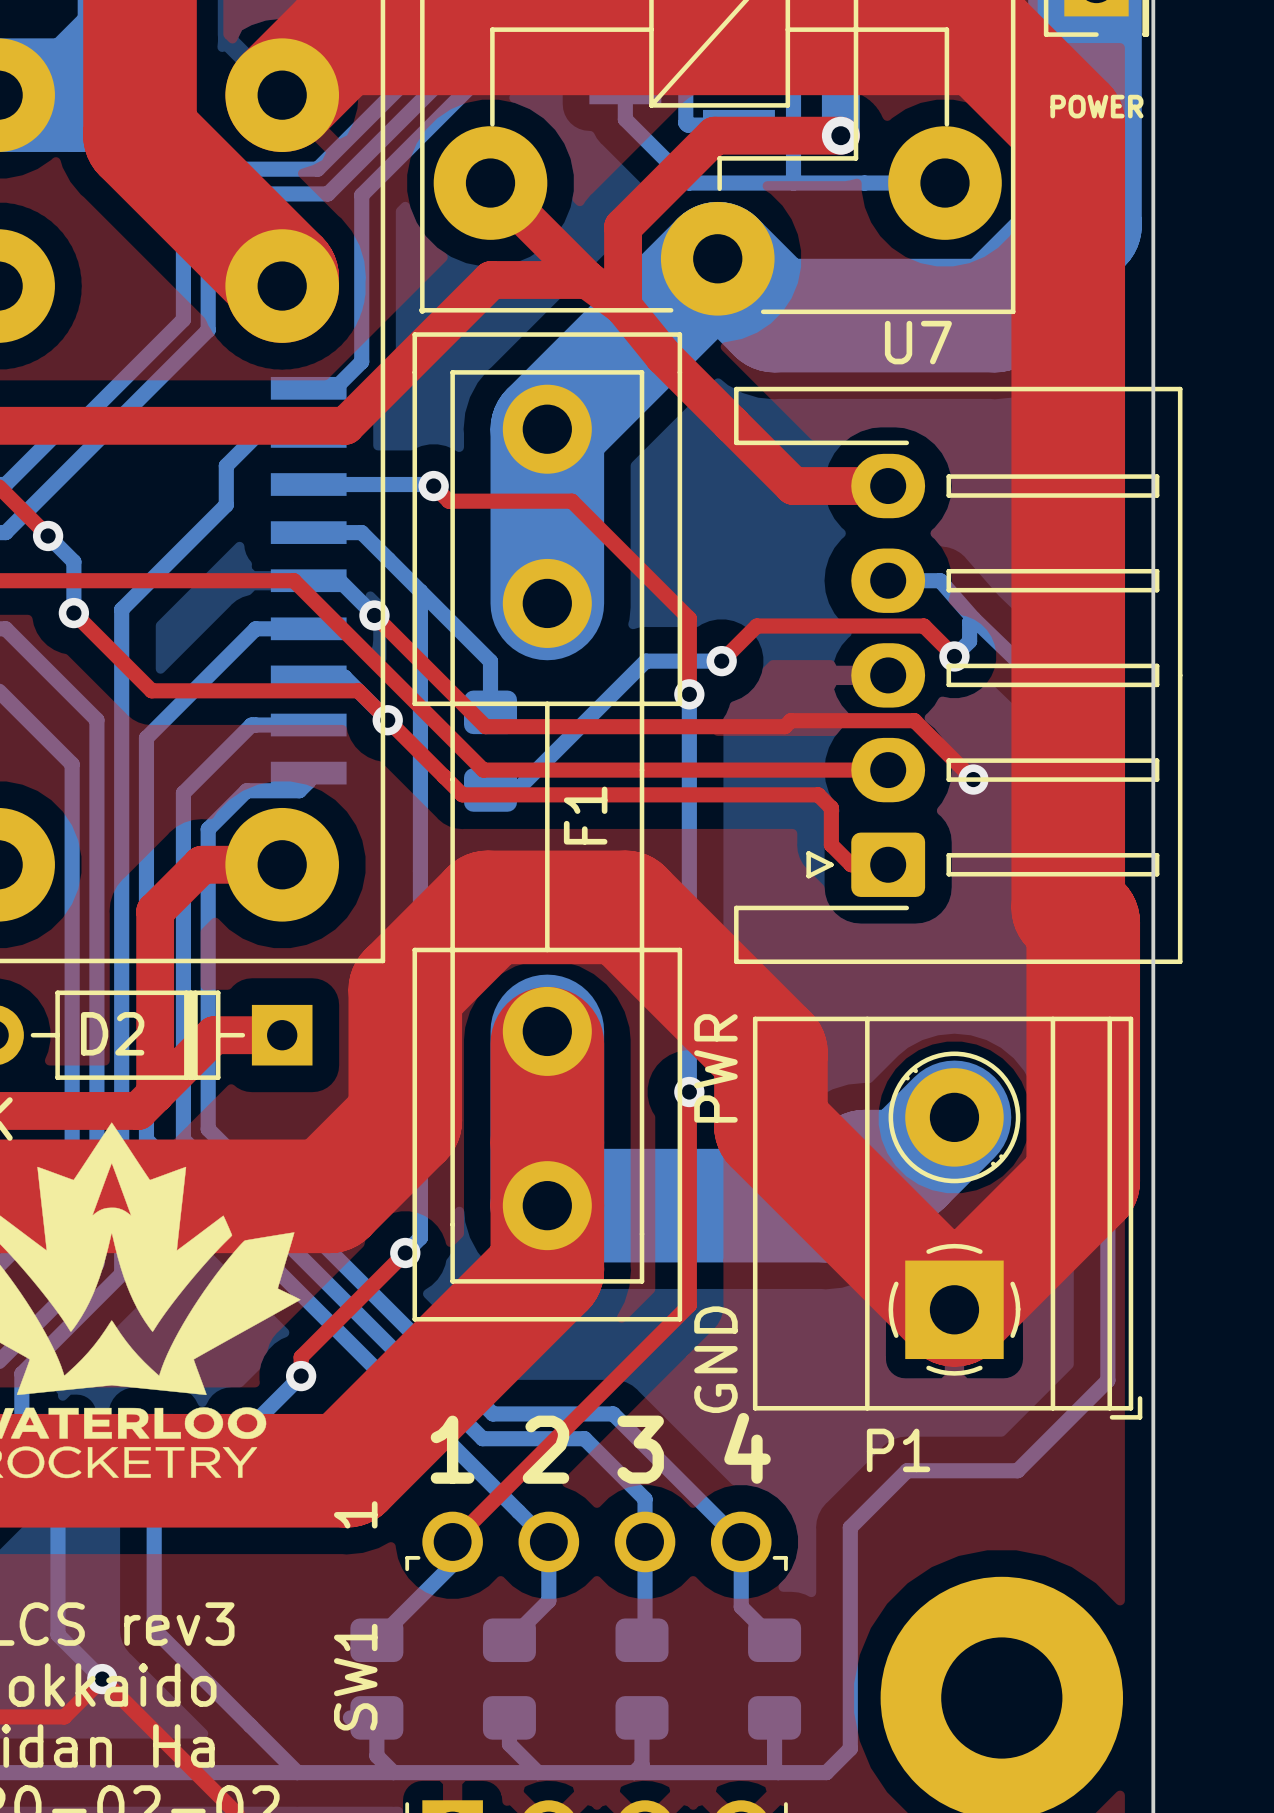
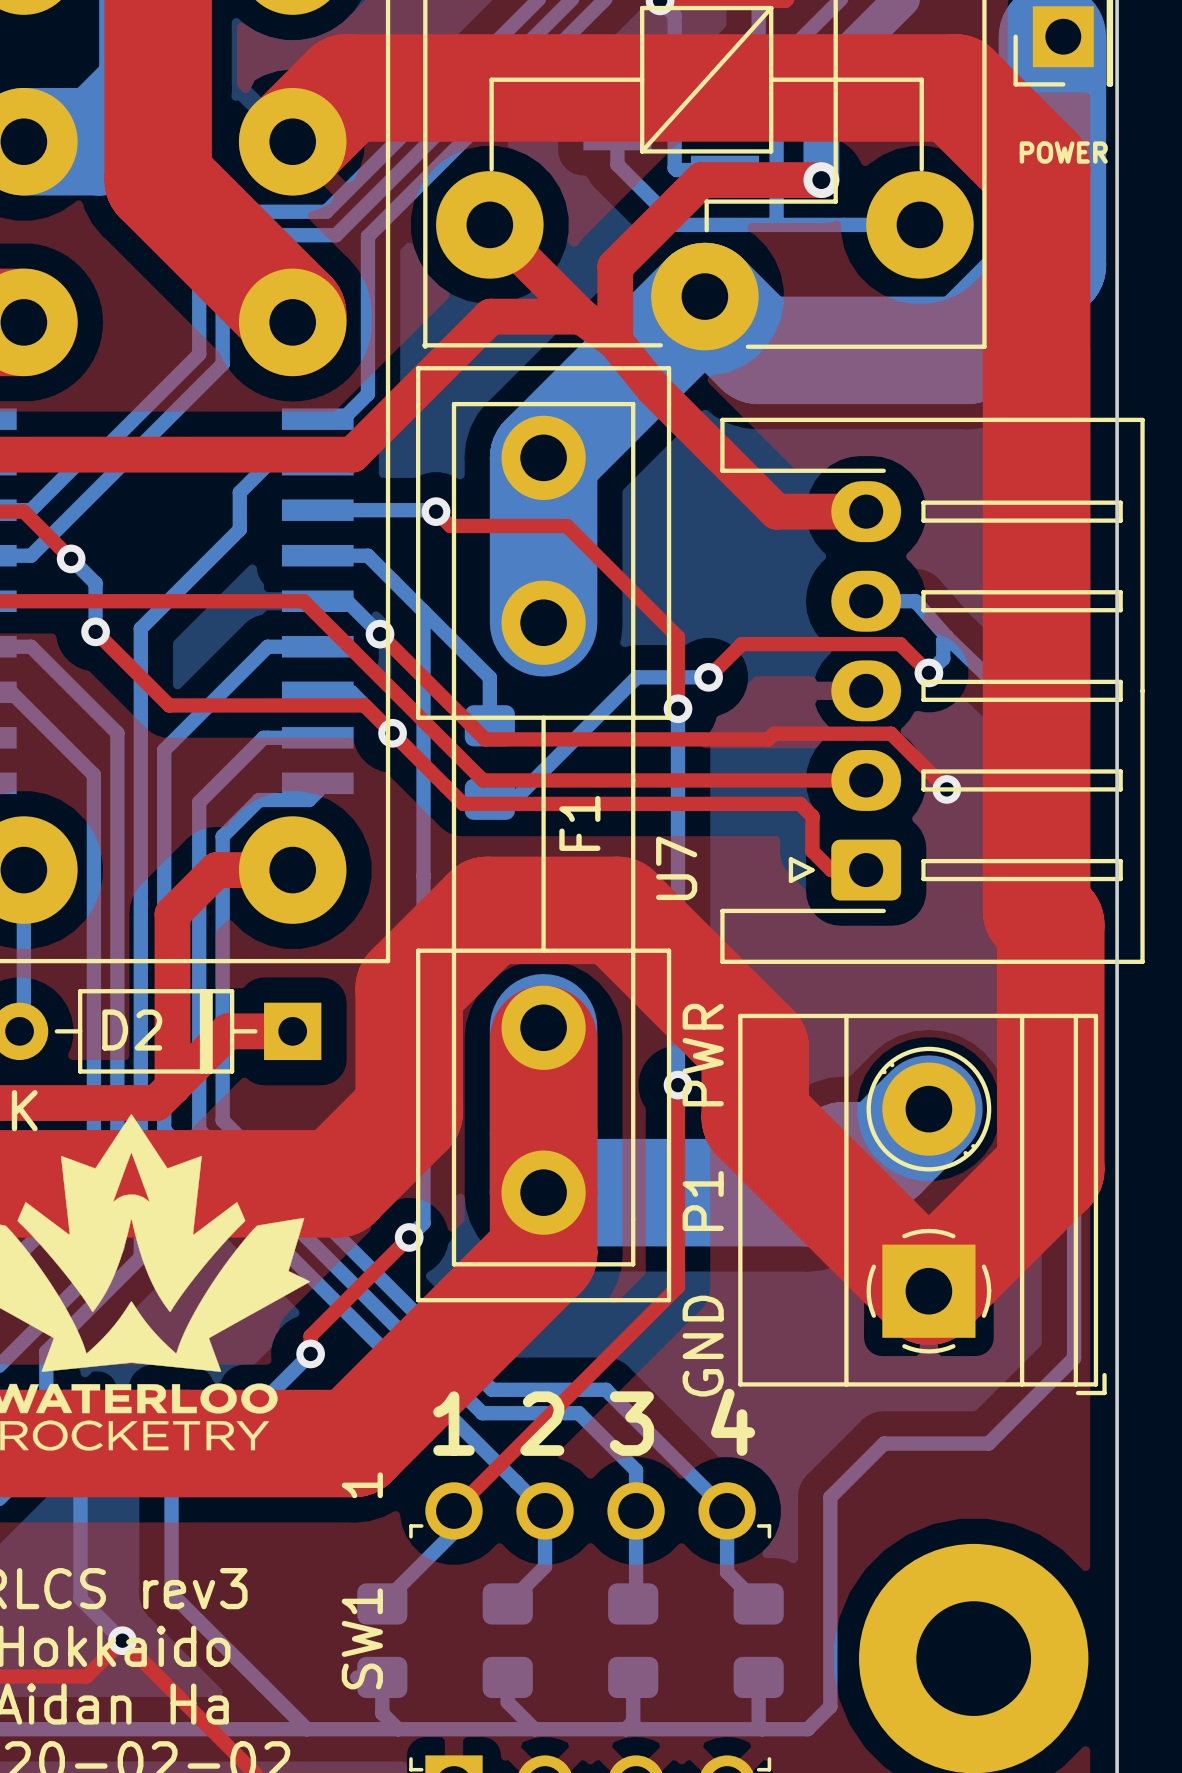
U7 name rotation: 0° (918, 342) -> 90° counterclockwise (676, 868)
U7 name position: U7 (918, 342) -> U7 (676, 868)
GND PWR name: GND PWR (715, 1213) -> GND P1 PWR (703, 1200)
text: P1 (898, 1450) -> none

